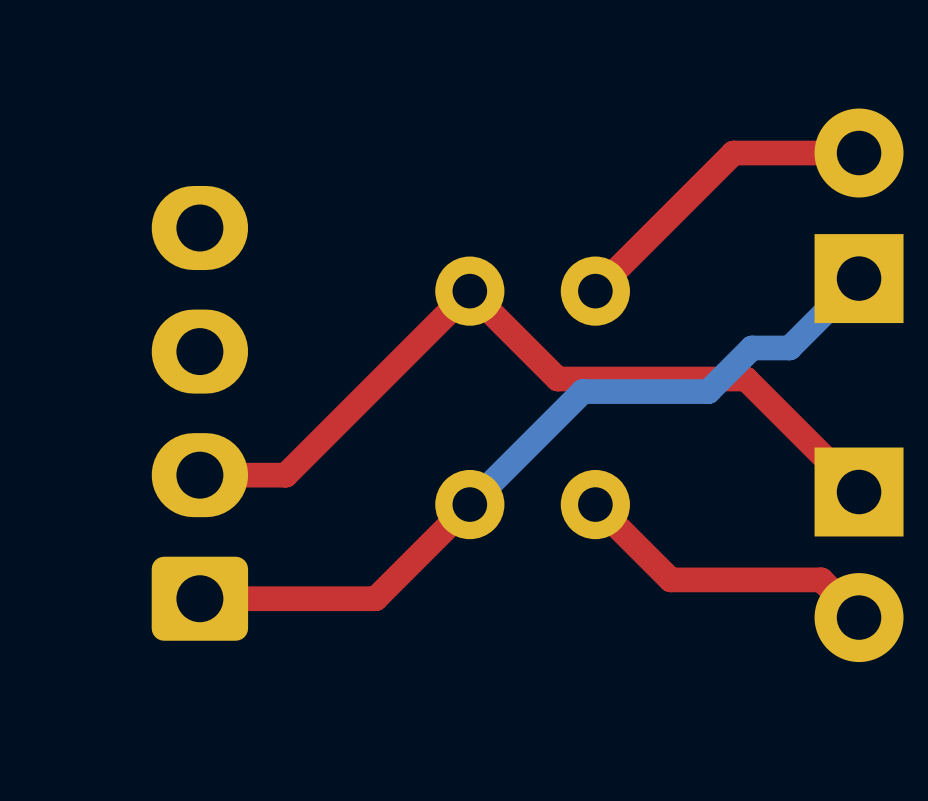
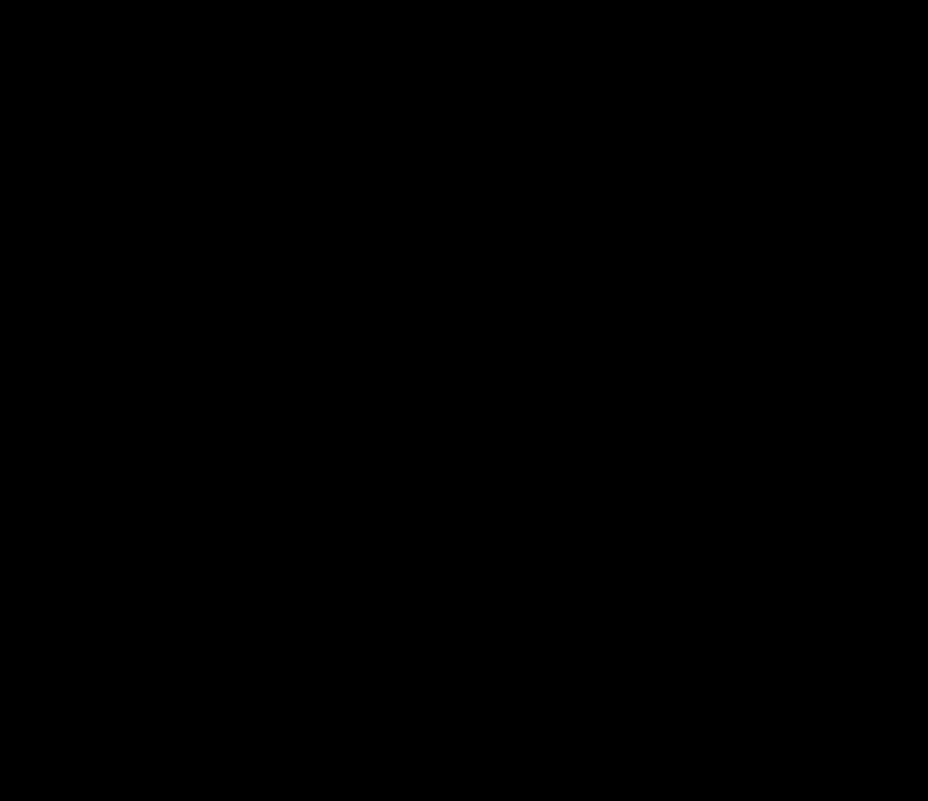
top track: (859, 153) (733, 153) (595, 291) -> none
part: (859, 215) -> none
bottom track: (859, 278) (789, 347) (751, 347) (708, 391) (582, 391) (469, 504) -> none
part: (532, 291) -> none
part: (199, 413) -> none
top track: (199, 475) (285, 475) (469, 291) (557, 379) (746, 379) (859, 492) -> none
top track: (469, 504) (375, 598) (199, 598) -> none
part: (532, 504) -> none
top track: (595, 504) (670, 579) (821, 579) (859, 617) -> none
part: (859, 554) -> none

